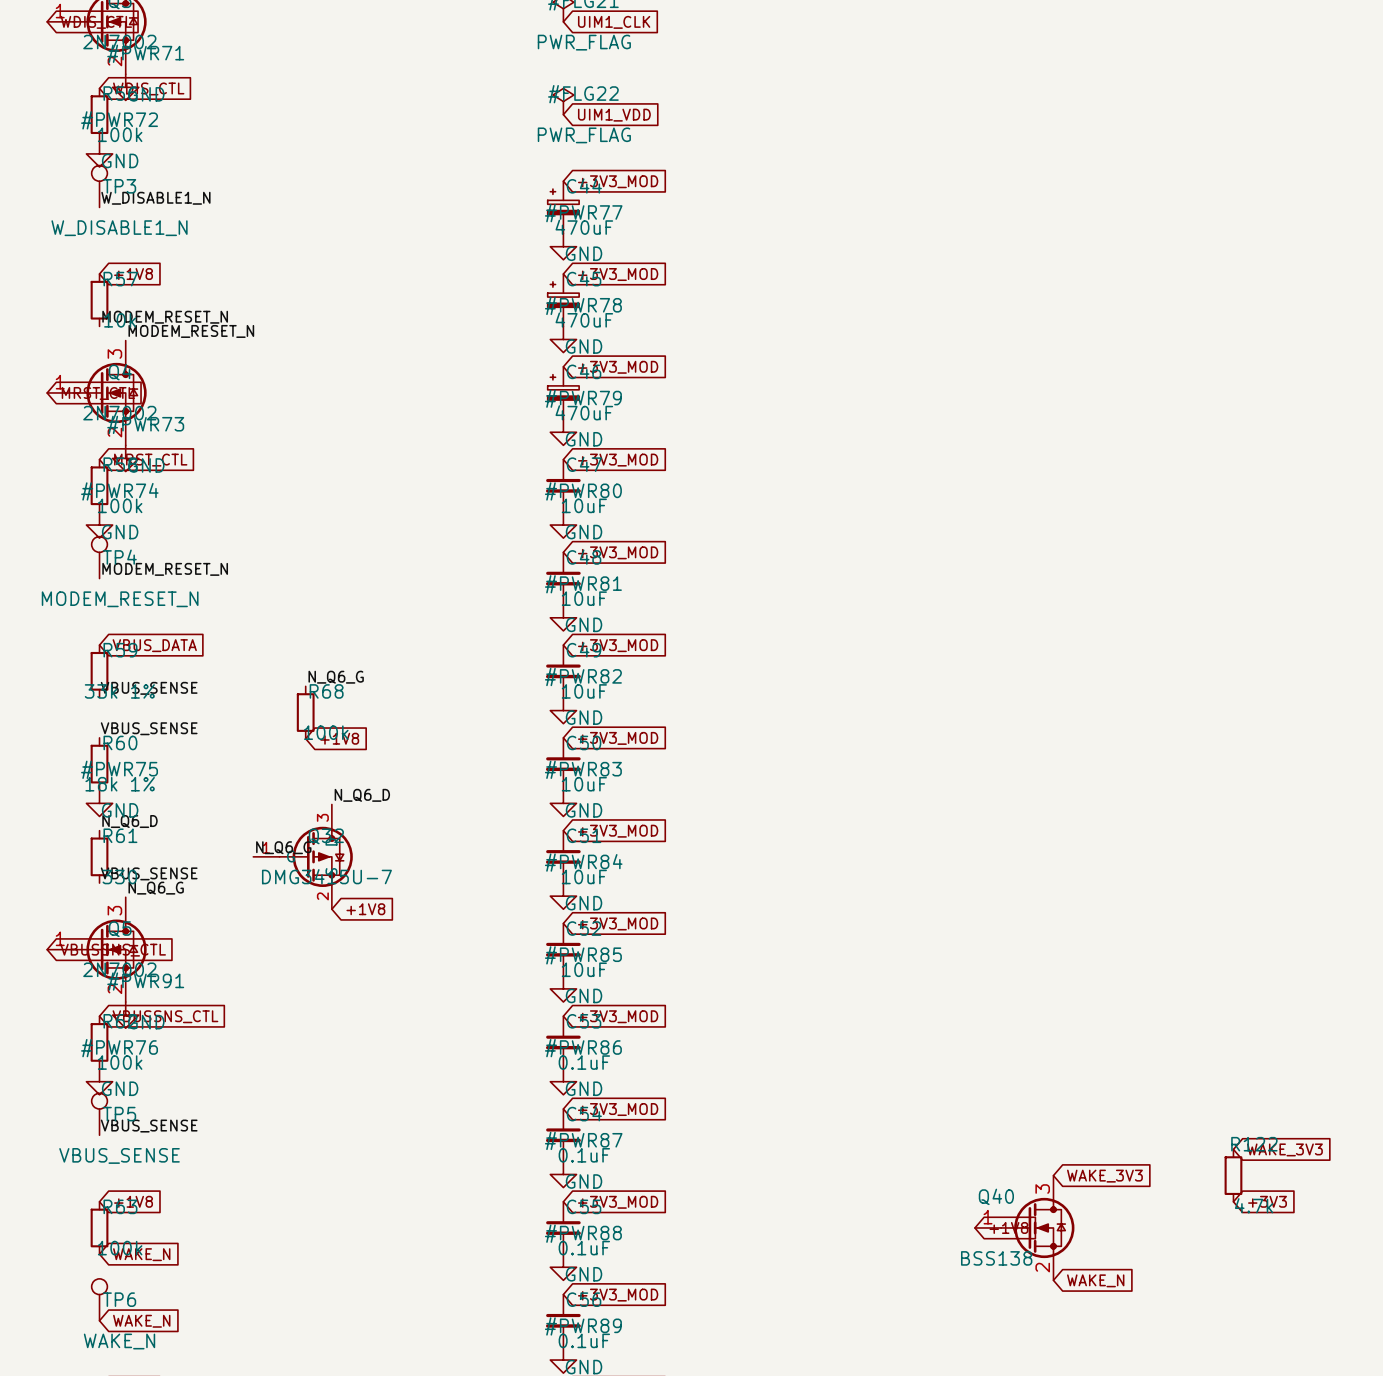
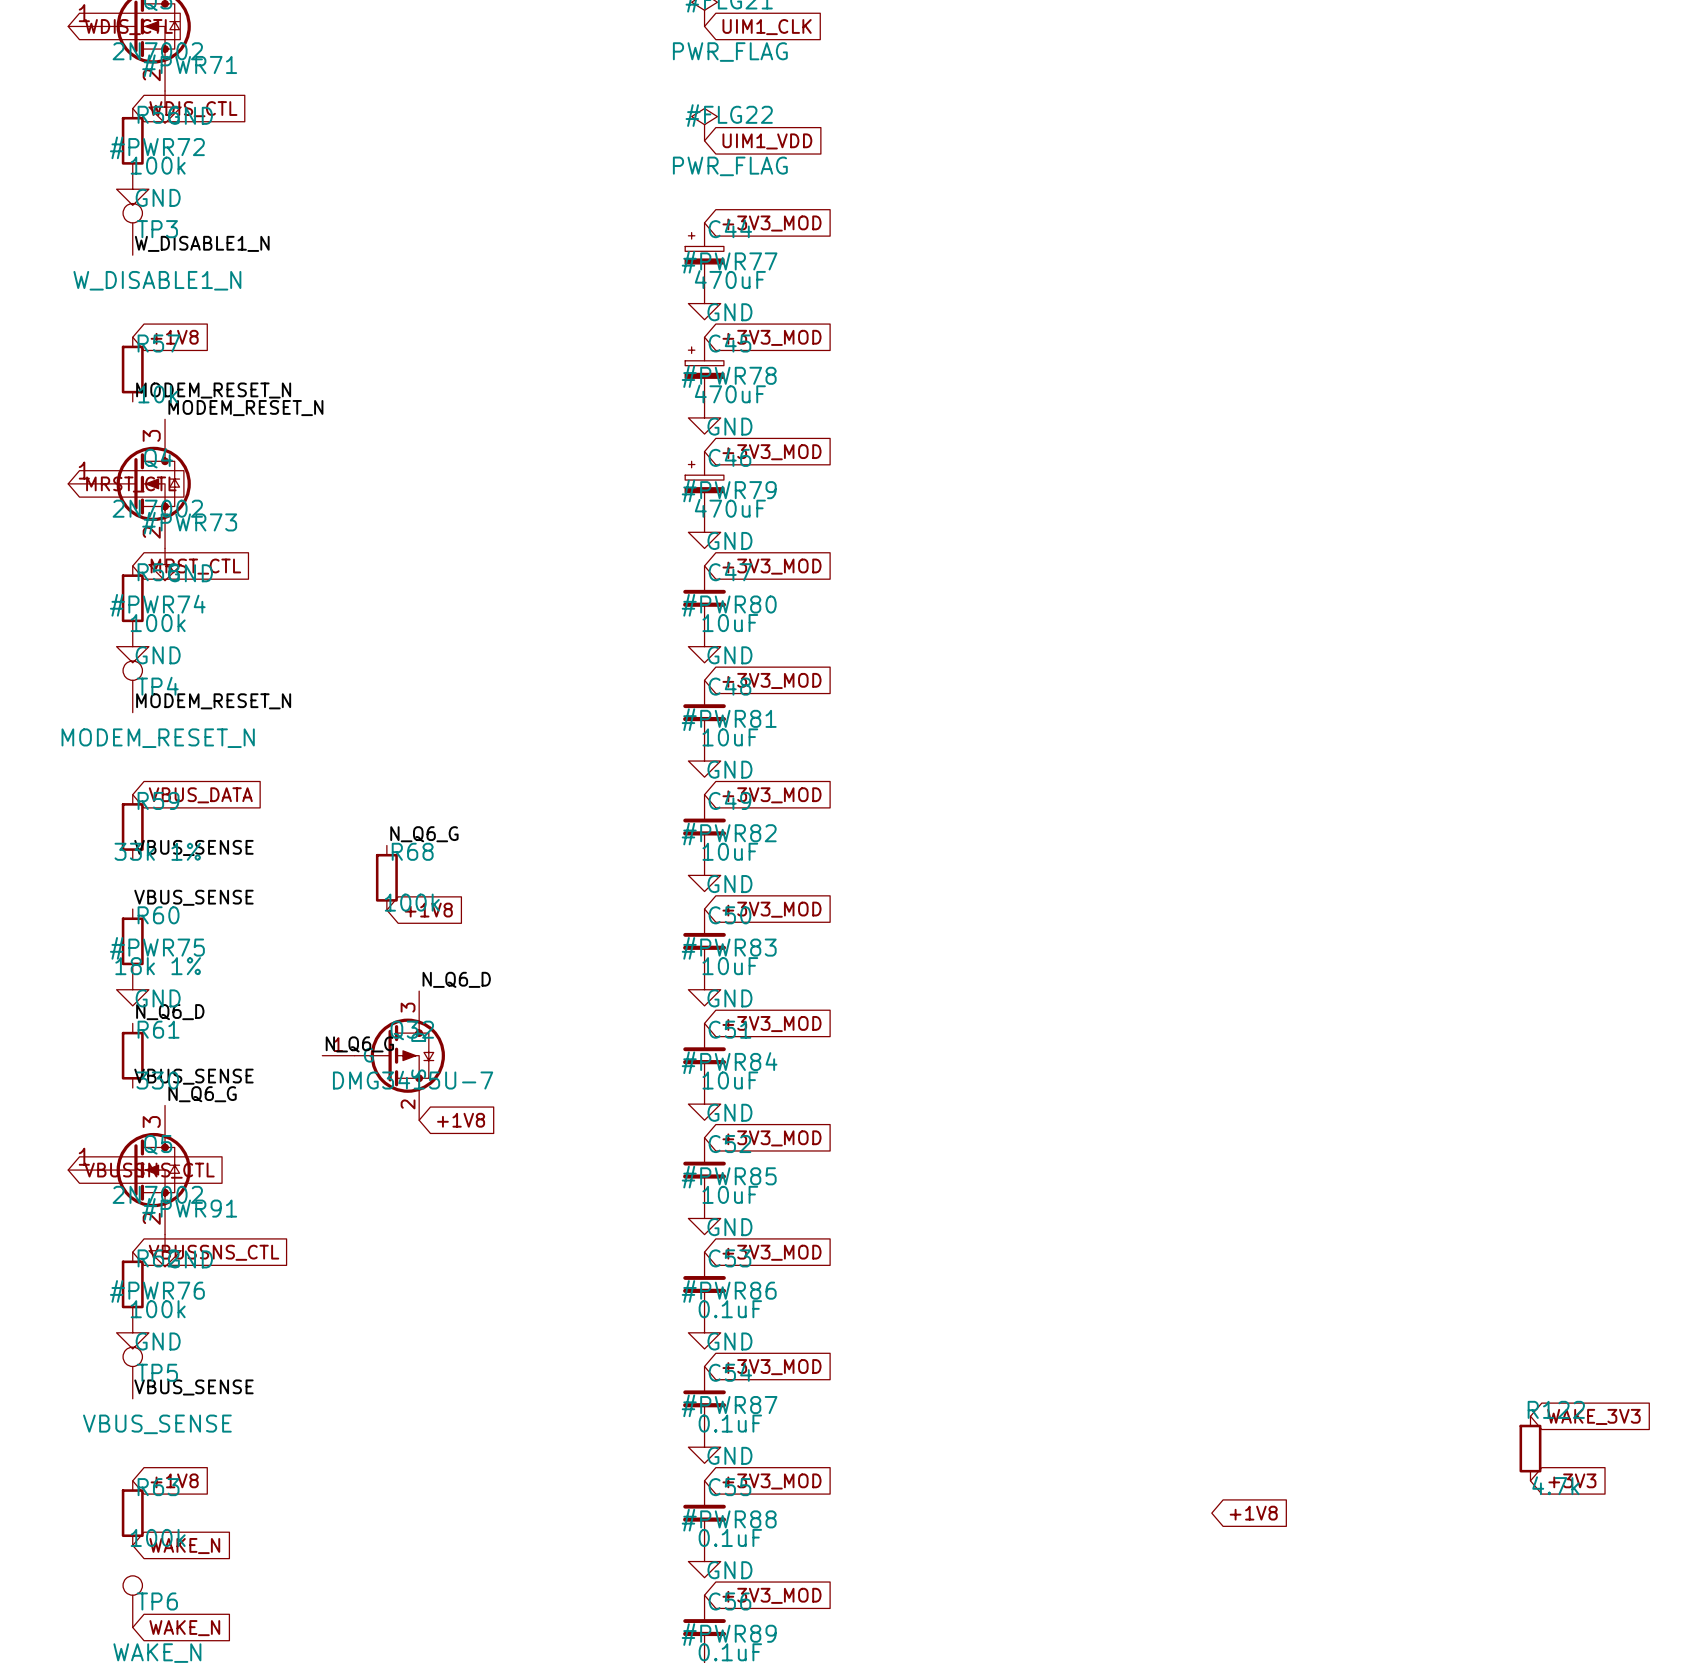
global label: WAKE_3V3 (1104, 1176) -> none
Q40: BSS138 (1024, 1227) -> none
global label: WAKE_N (1095, 1280) -> none

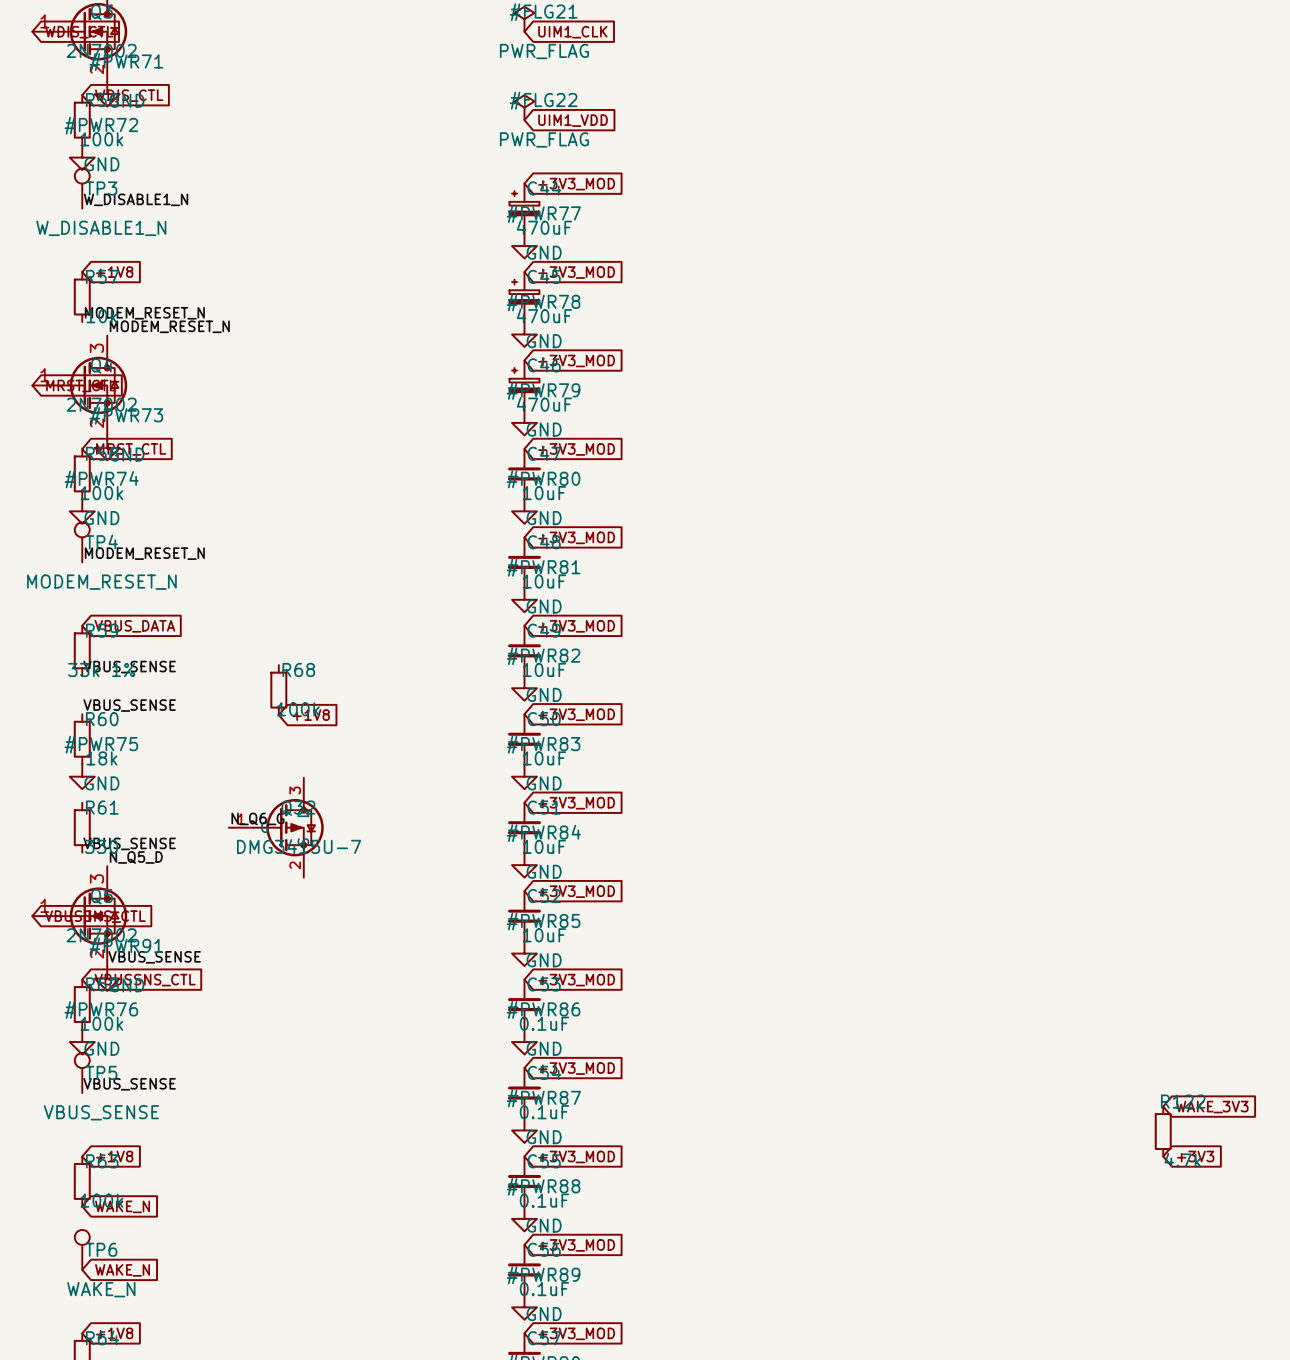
label: N_Q6_G (424, 834) -> none
R60 value: 18k 1% (158, 966) -> 18k (101, 758)
label: N_Q6_D (456, 979) -> none
label: N_Q6_D (170, 1012) -> none
label: N_Q6_G (202, 1094) -> N_Q5_D (136, 857)
global label: +1V8 (461, 1120) -> none
label: none -> VBUS_SENSE (154, 957)
global label: +1V8 (1253, 1513) -> none

